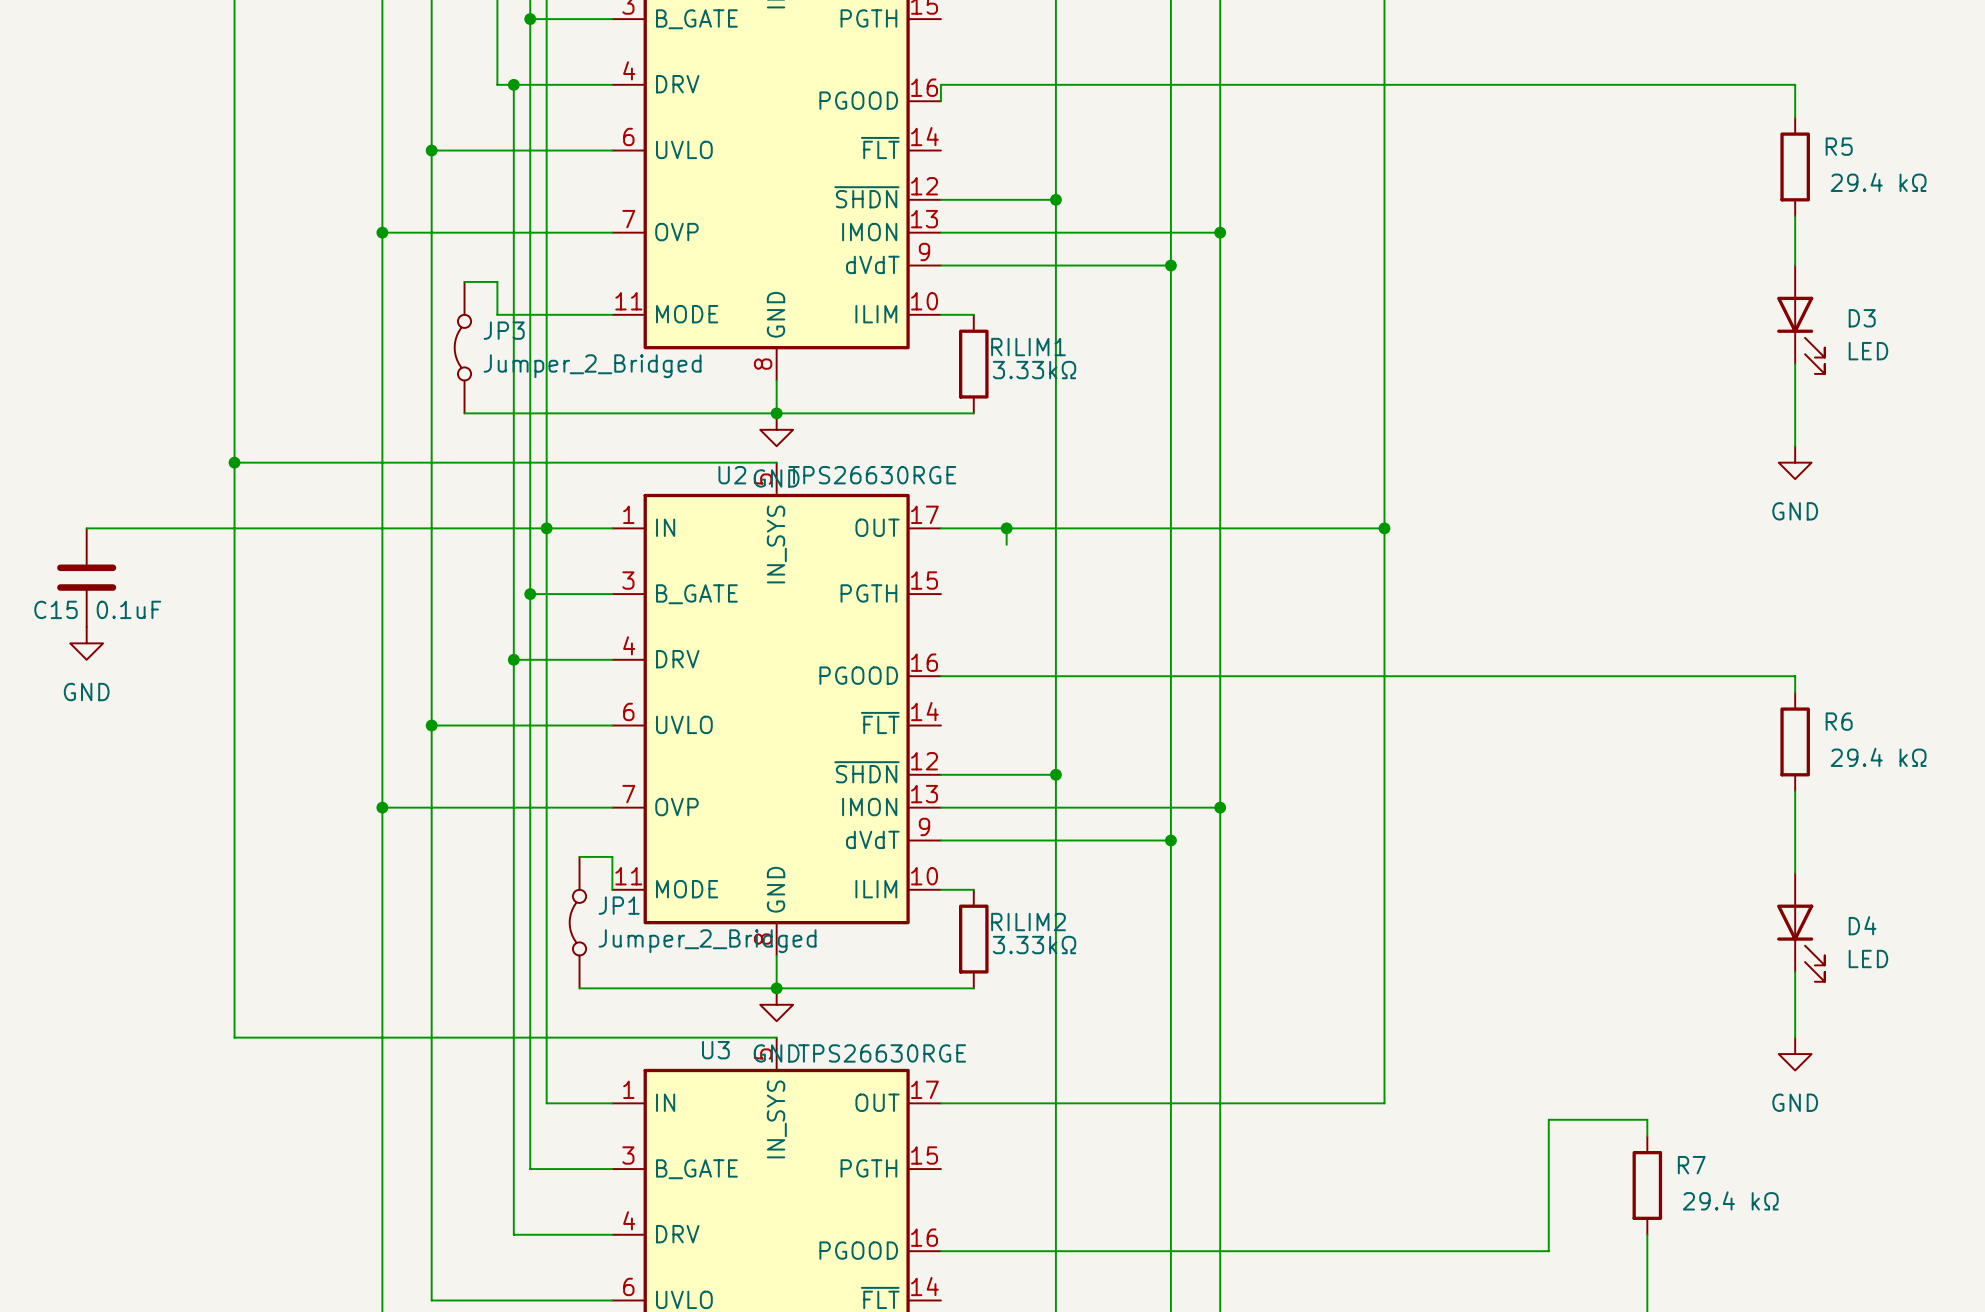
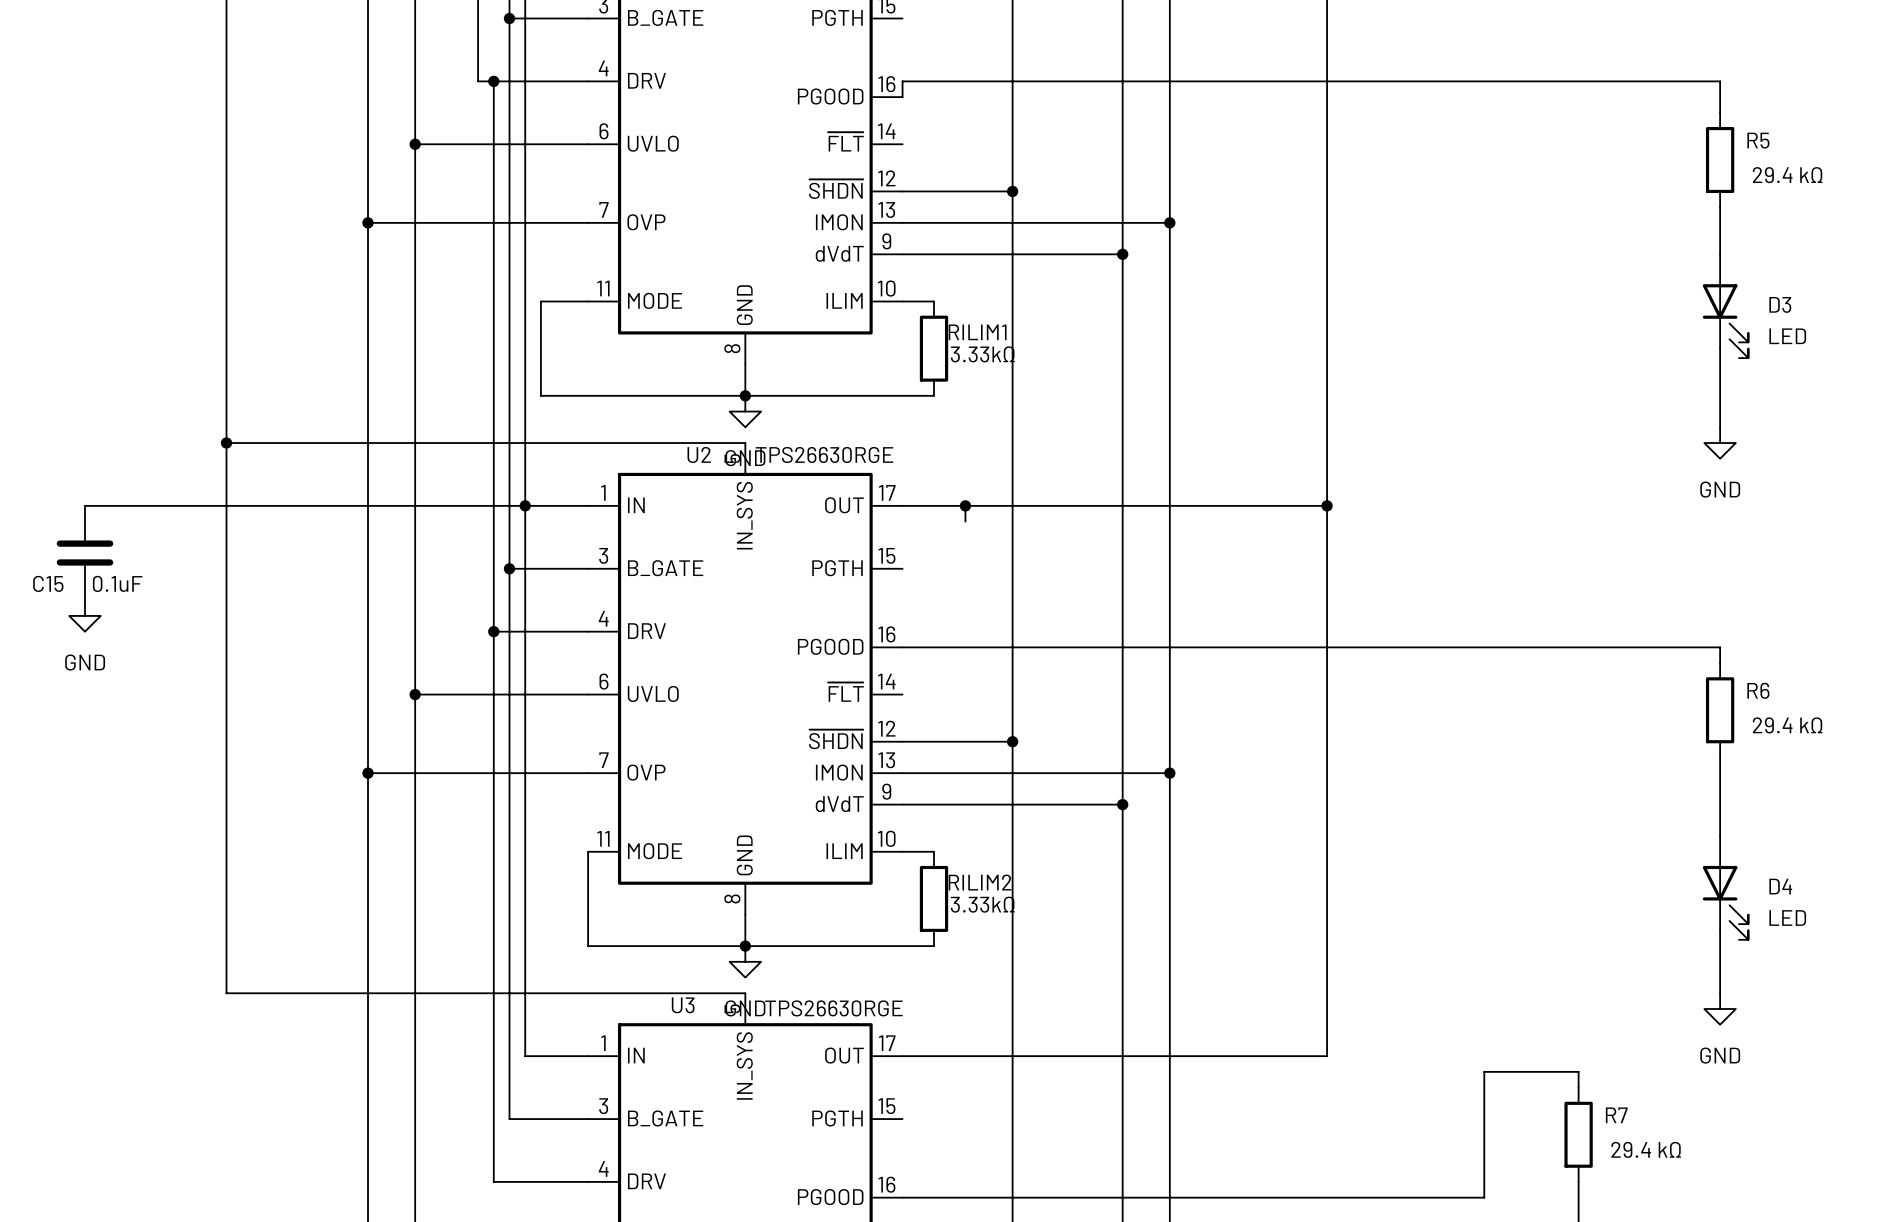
wire: (464, 281) (497, 281) (497, 314) (563, 314) -> none
JP3: Jumper_2_Bridged (462, 347) -> none
wire: (464, 413) (563, 413) -> (540, 301) (540, 395)
wire: (579, 856) (612, 856) (612, 889) -> none
JP1: Jumper_2_Bridged (577, 922) -> none
wire: (579, 988) (612, 988) -> (588, 851) (588, 946)

